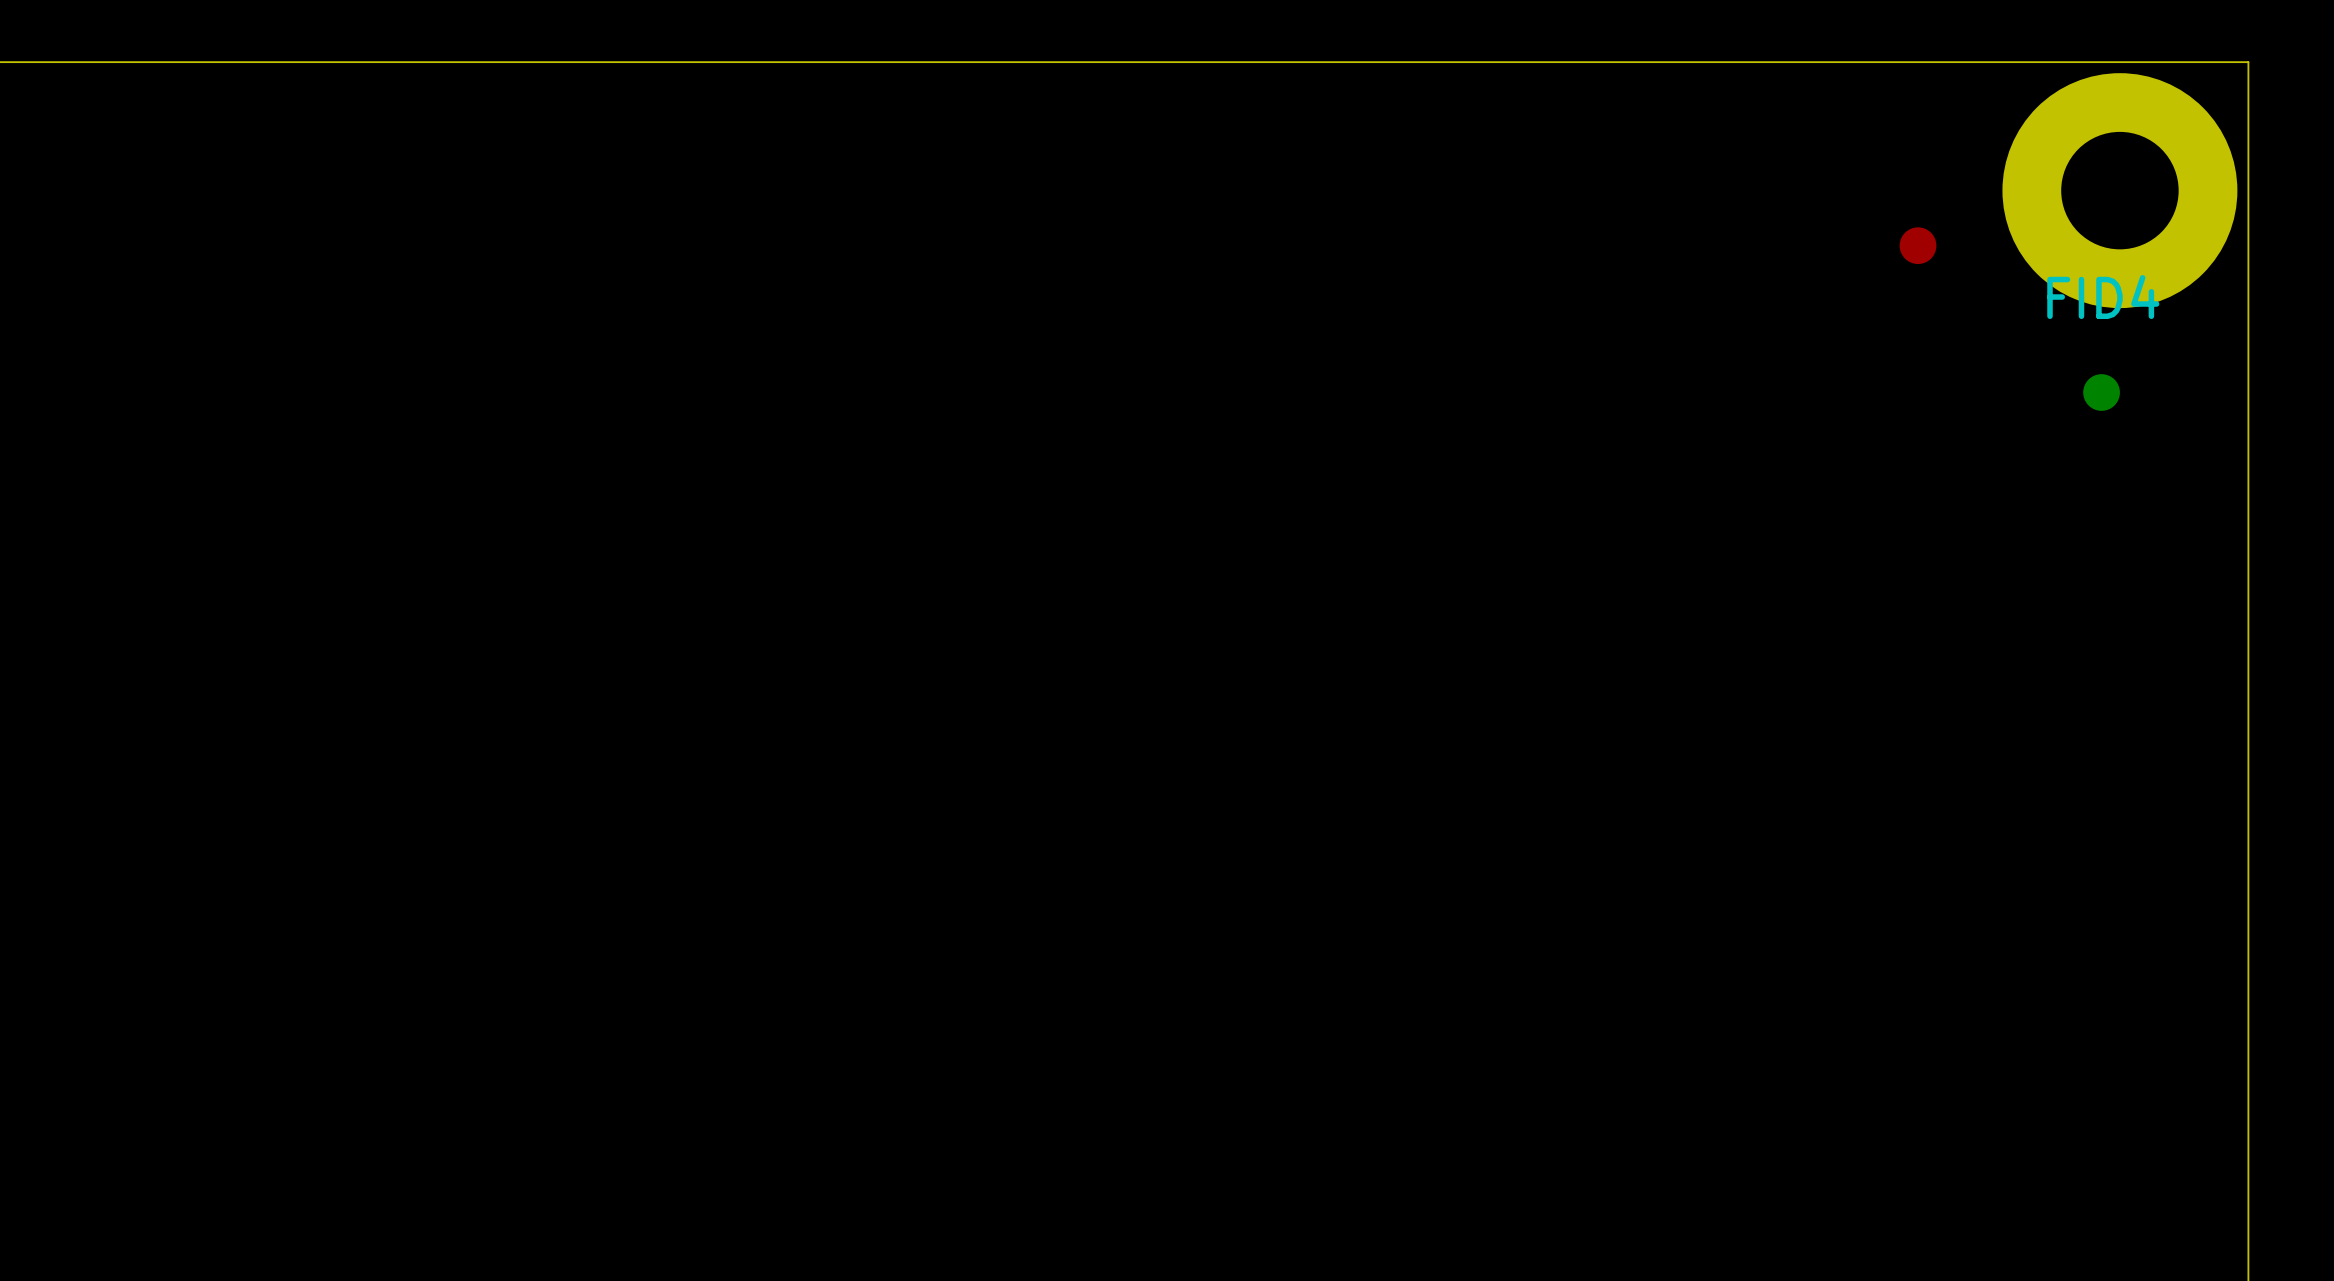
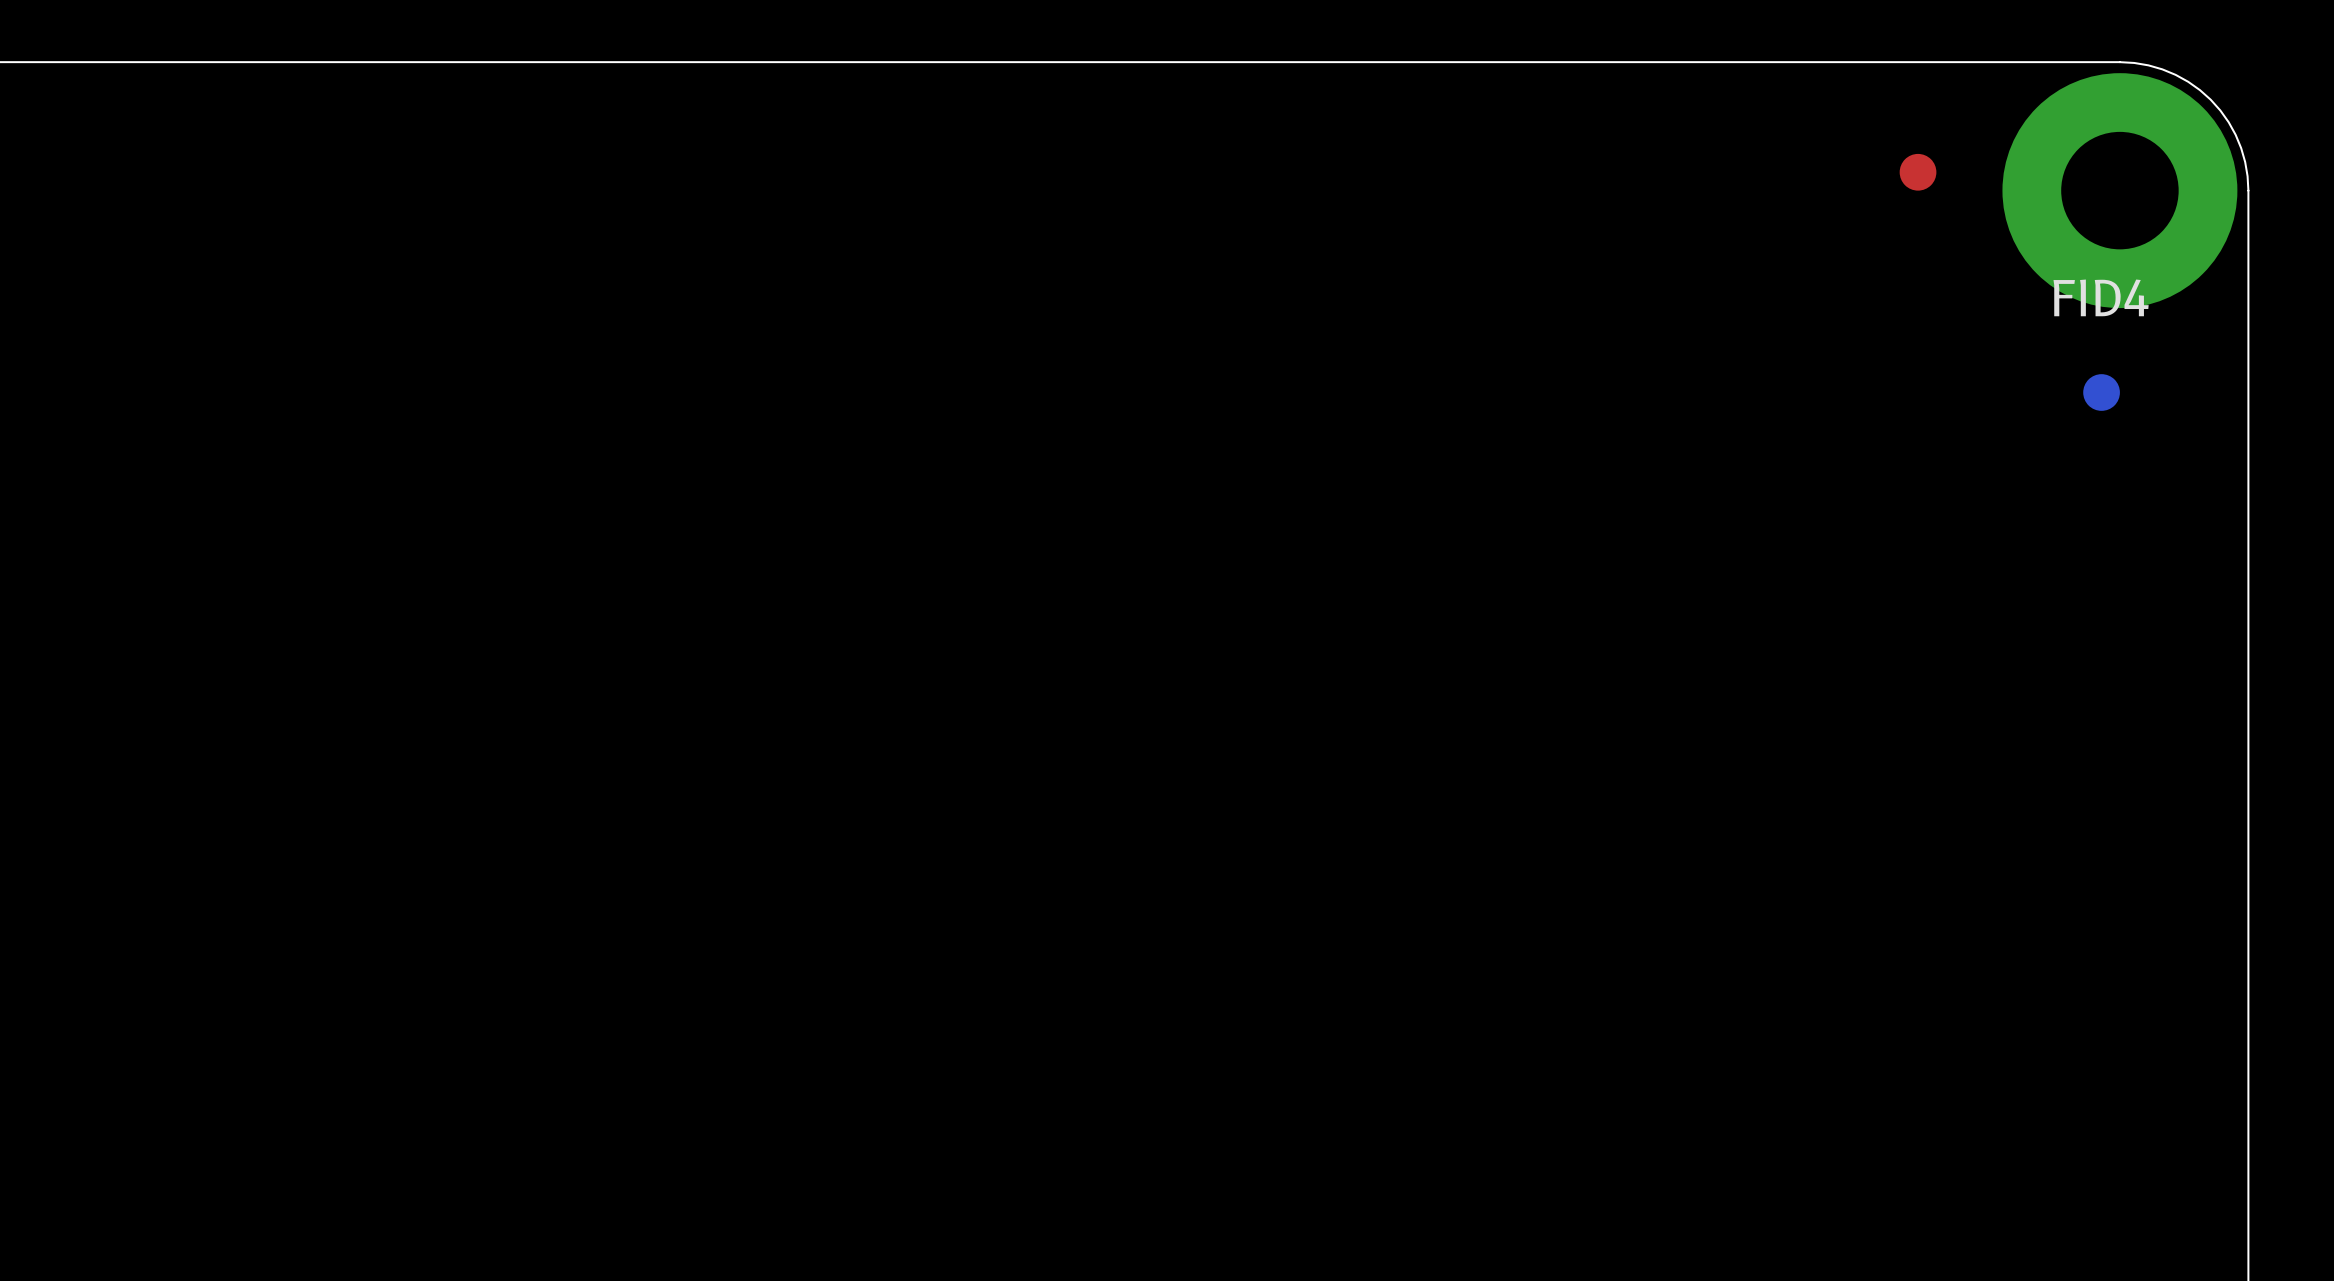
board edge: (2119, 62) (2248, 62) (2248, 190) -> (2119, 62) (2134, 62) (2162, 69) (2188, 81) (2210, 99) (2228, 122) (2241, 148) (2245, 162) (2248, 190)
part position: (1918, 245) -> (1918, 172)

